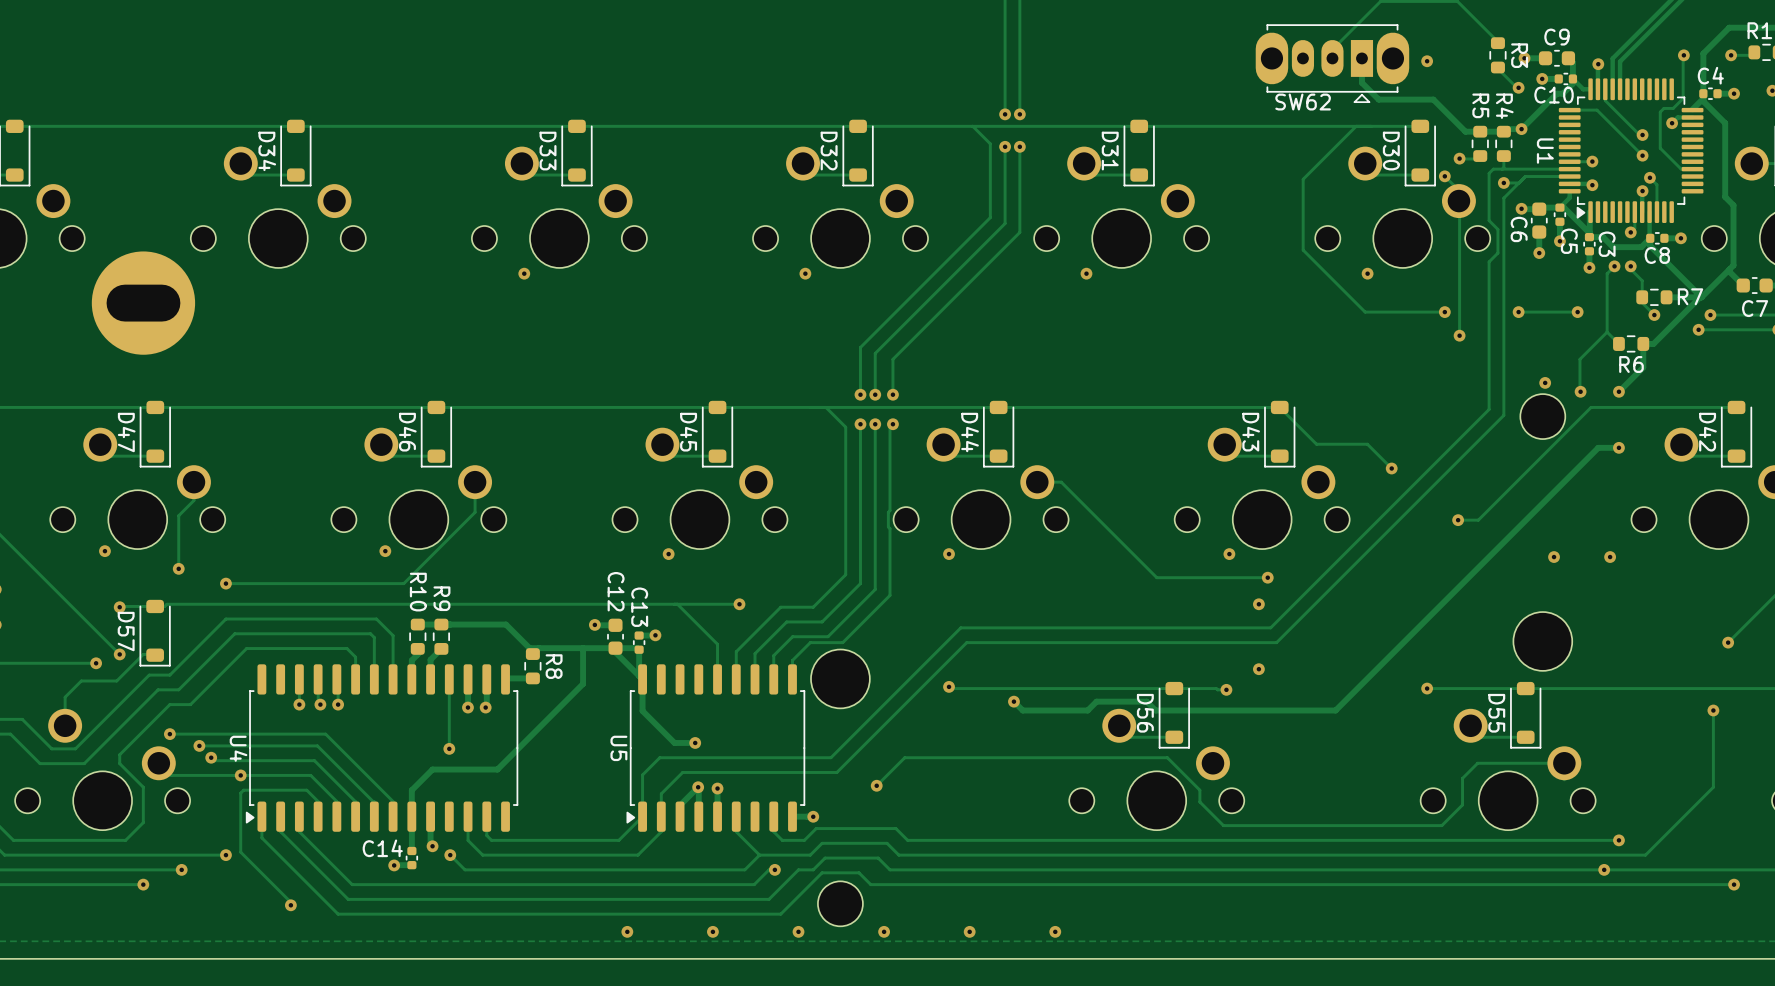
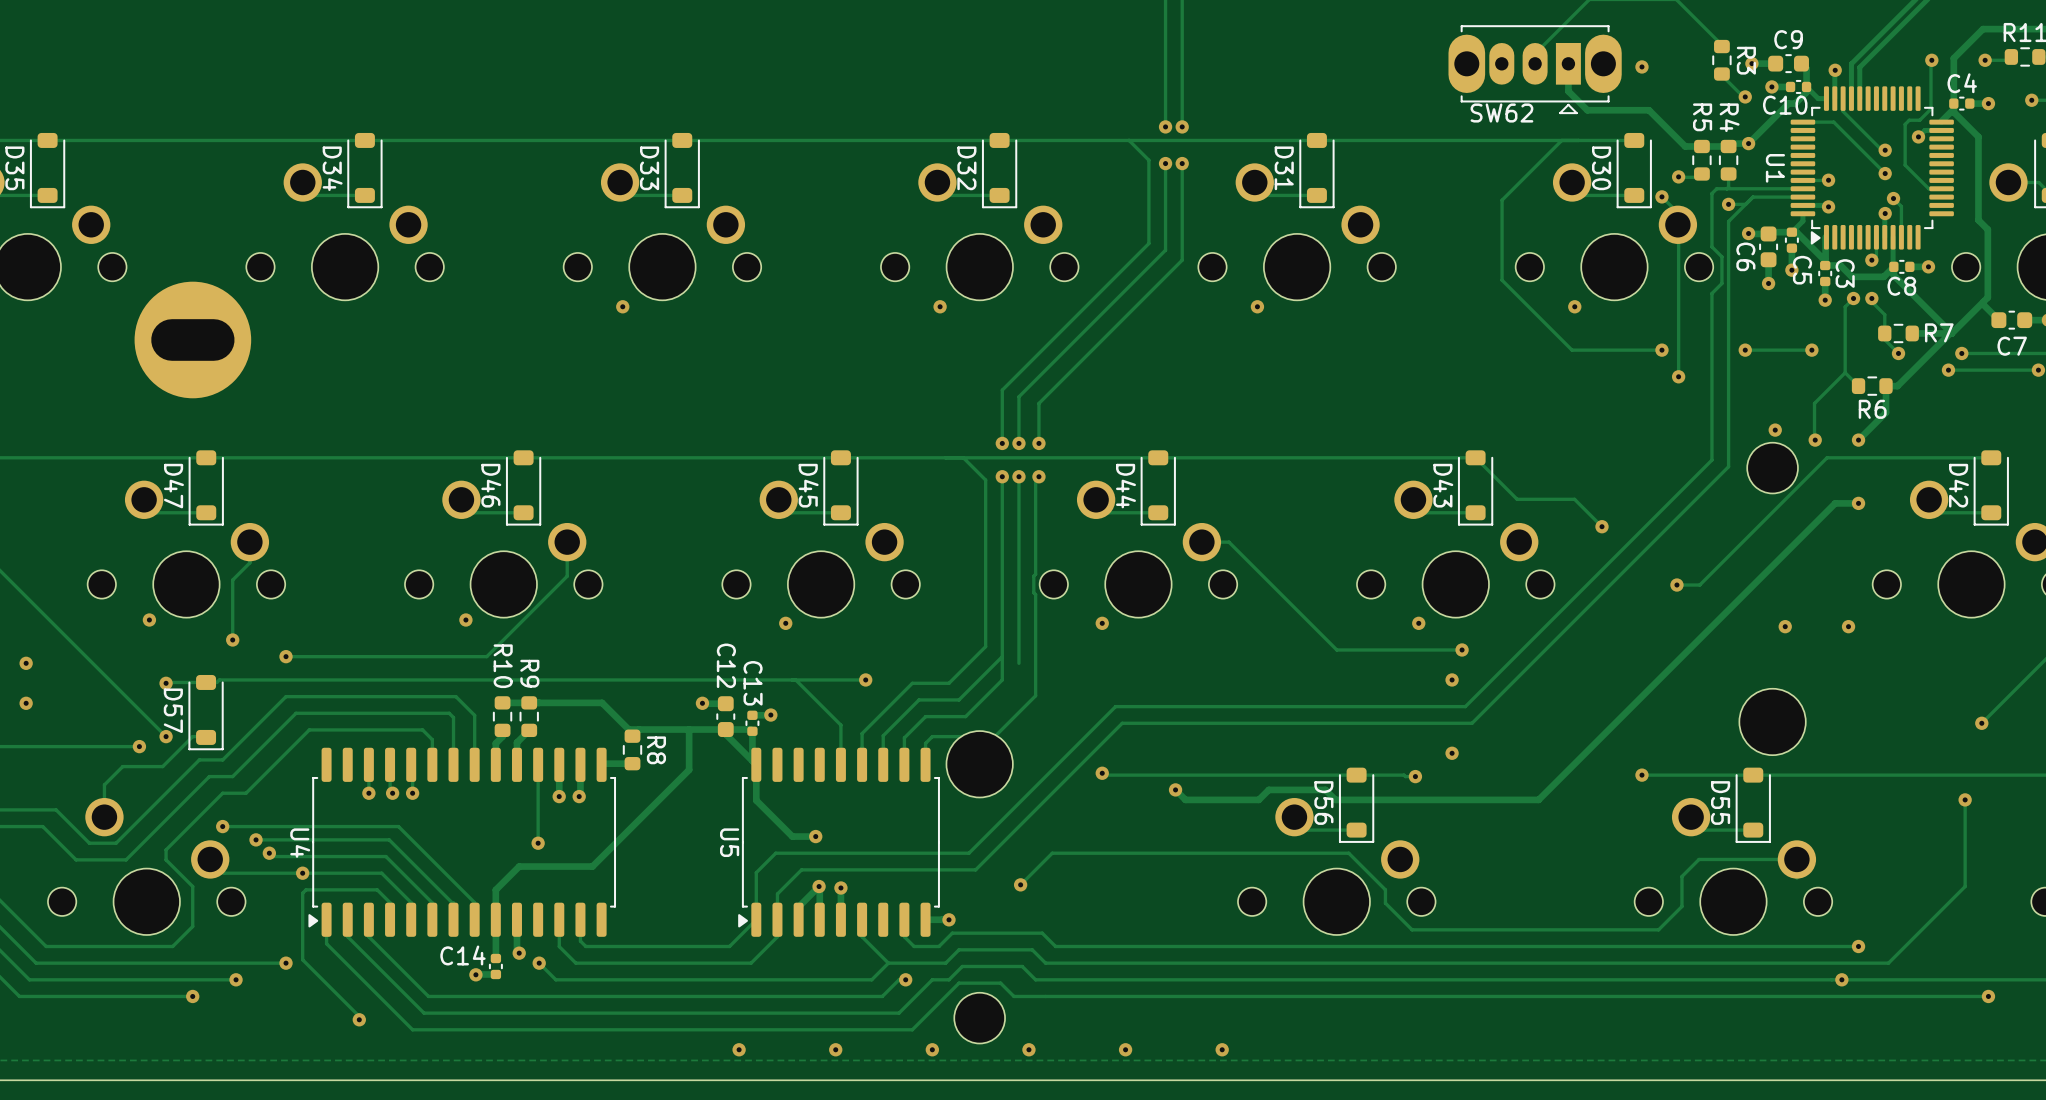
track: (875, 589) (860, 604) -> (1002, 656) (1002, 679)
track: (889, 595) (842, 642) (810, 642) (798, 654) -> (1035, 669) (1035, 695) (994, 736) (932, 736)

